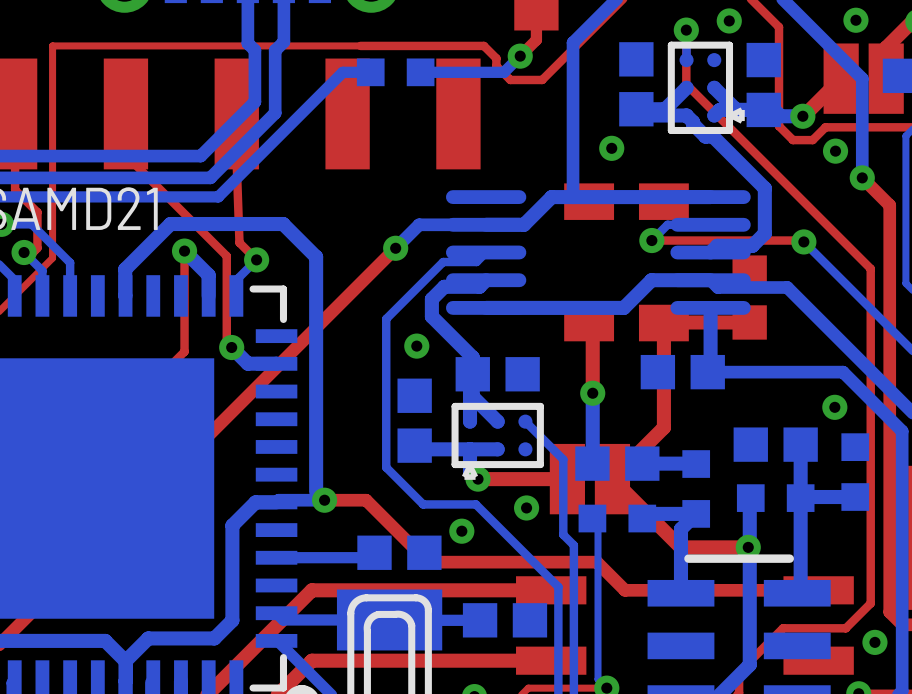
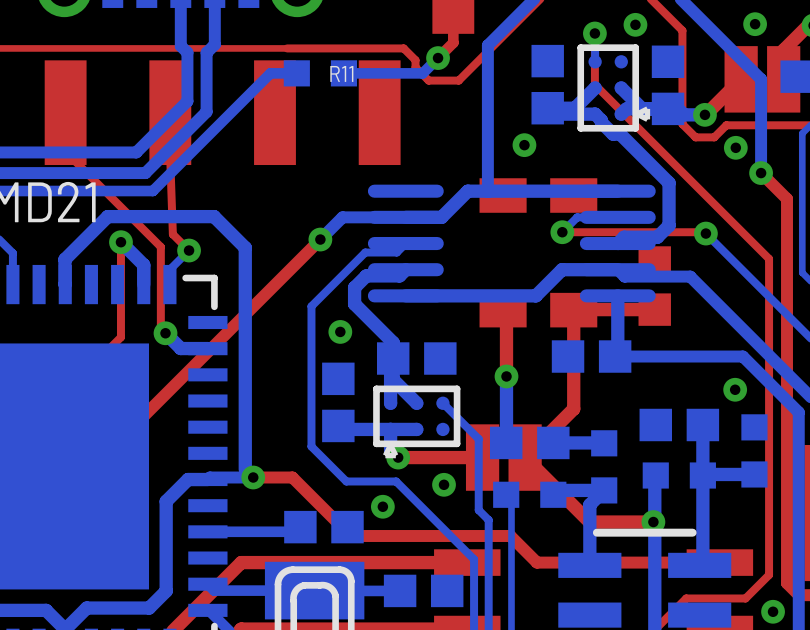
R11 name: none -> R11 (341, 73)

